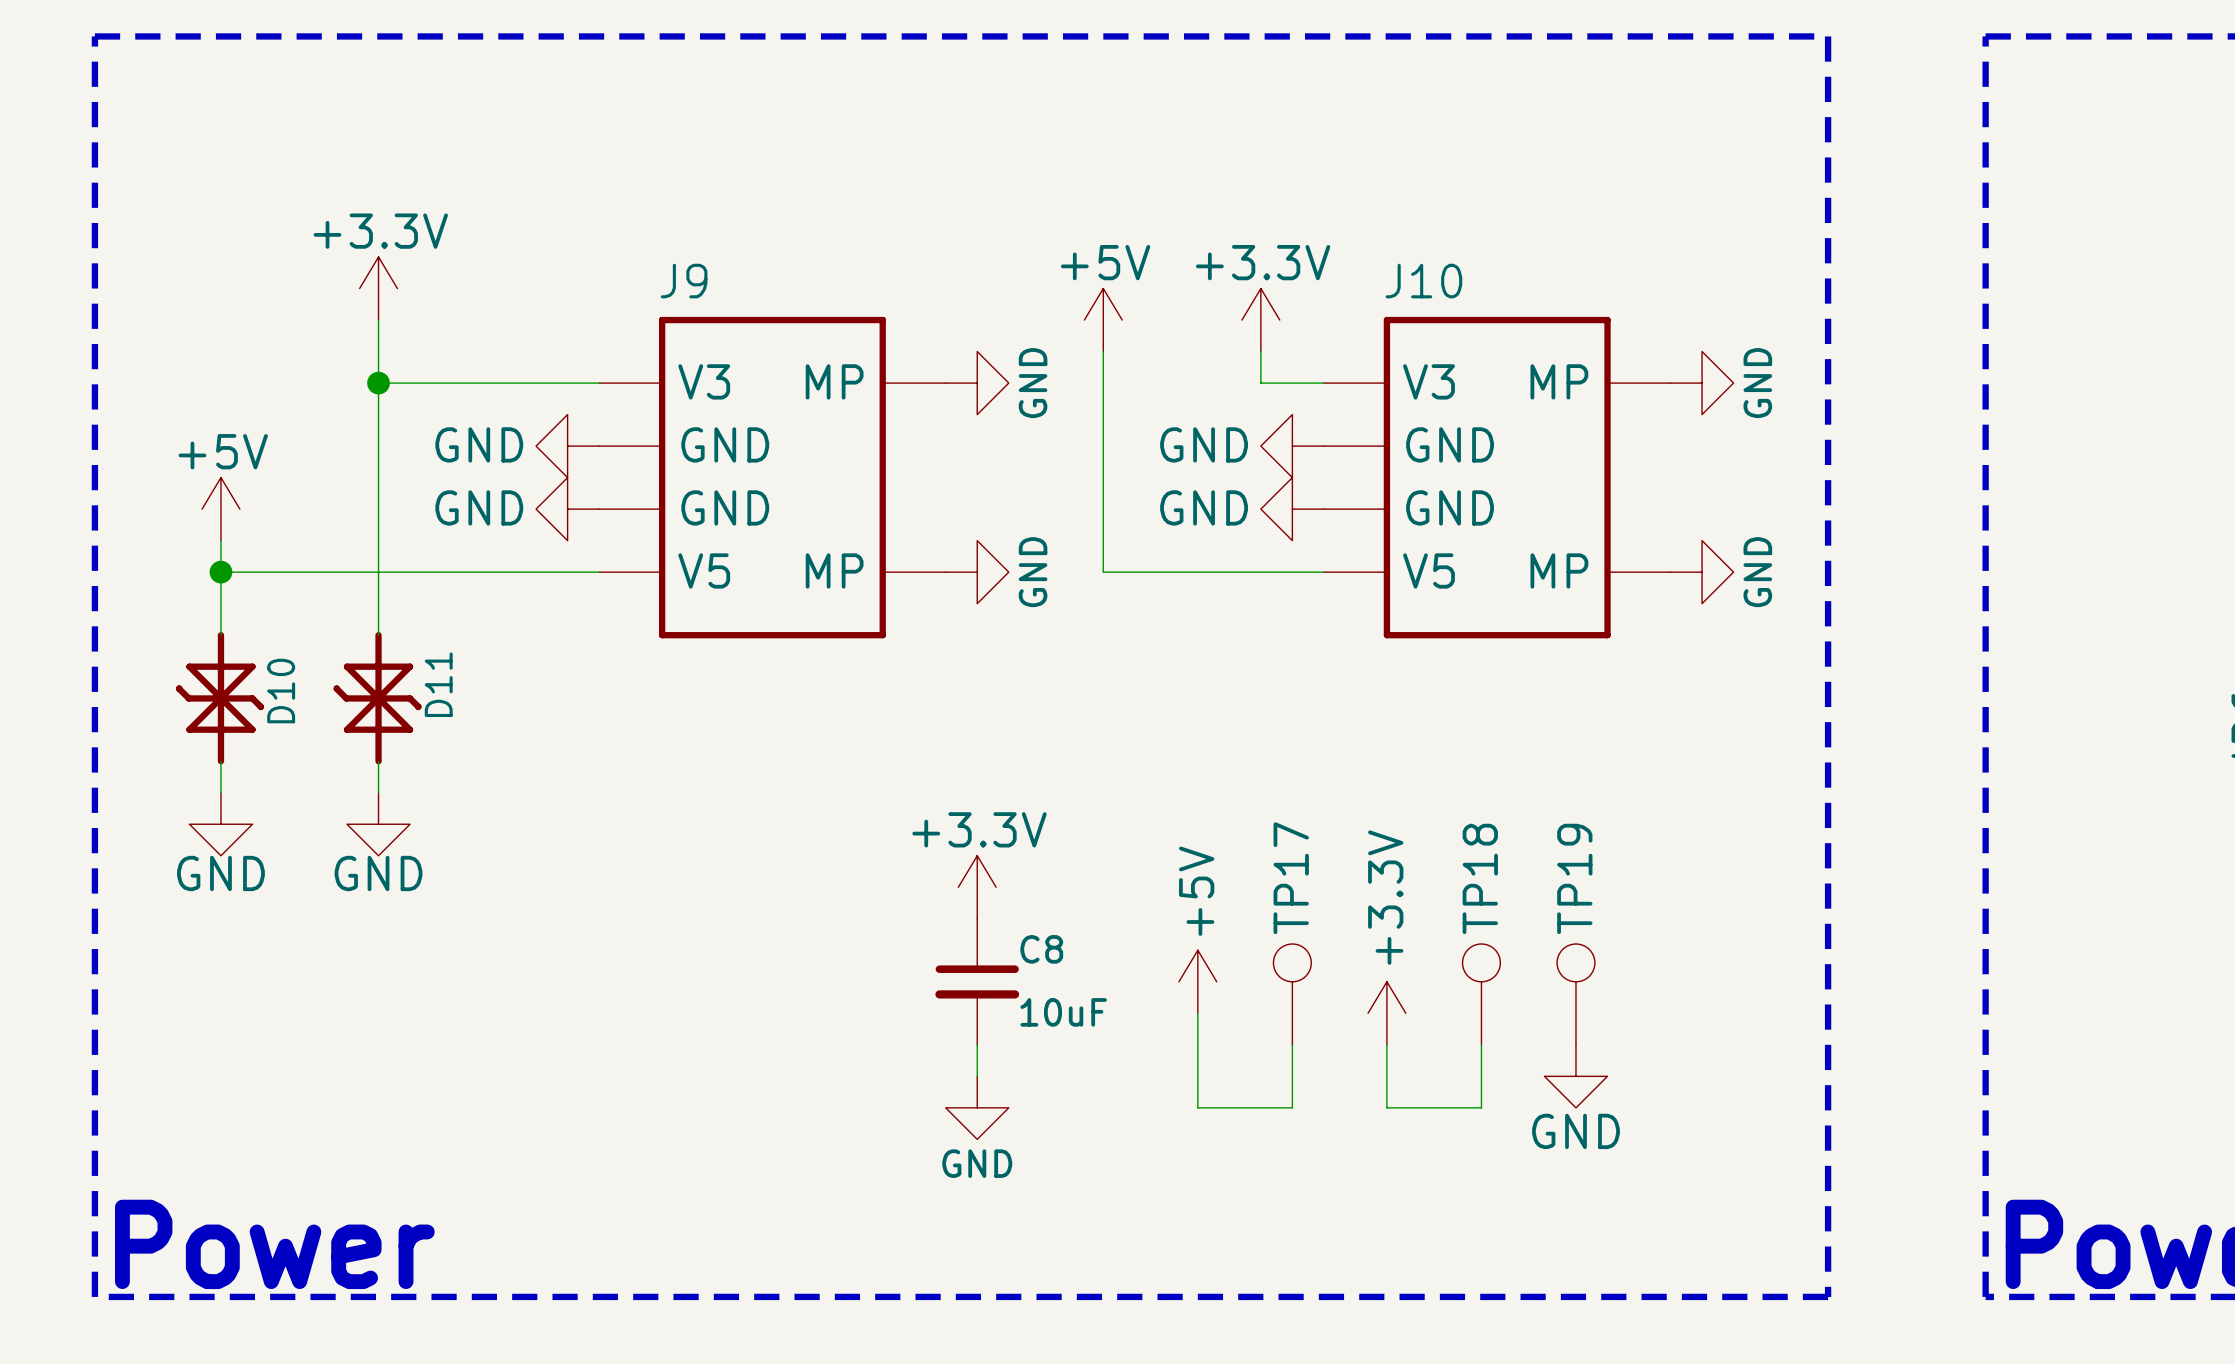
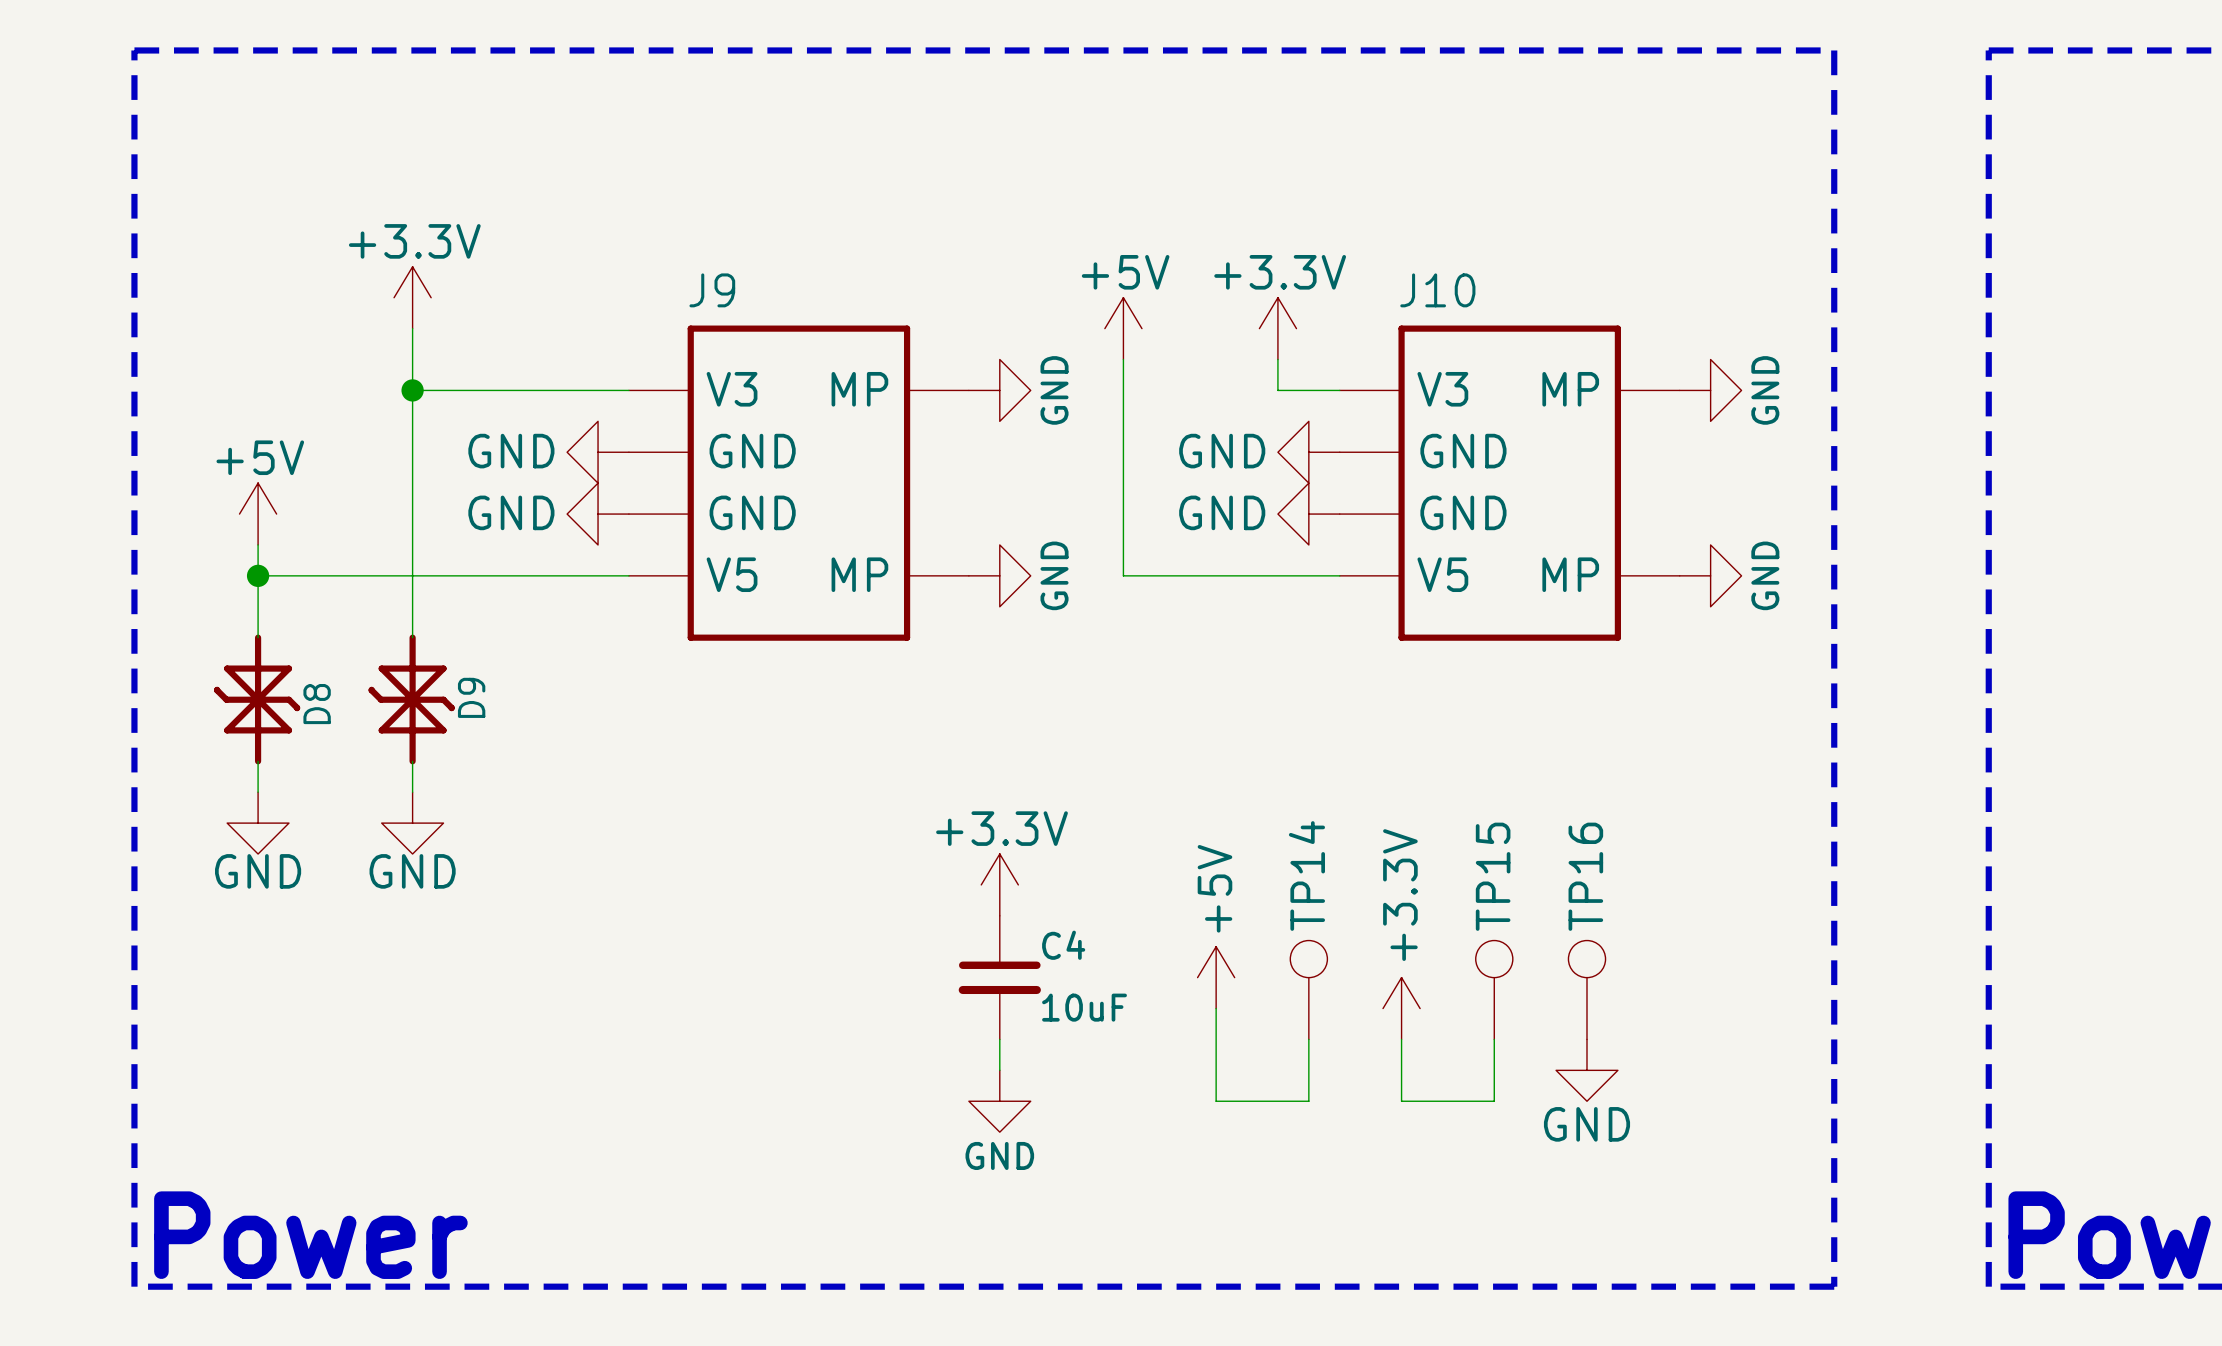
D11 name: D11 (438, 684) -> D9 (471, 697)
D10 name: D10 (281, 691) -> D8 (317, 704)
TP17 name: TP17 (1291, 878) -> TP14 (1306, 876)
TP18 name: TP18 (1480, 878) -> TP15 (1493, 876)
TP19 name: TP19 (1574, 878) -> TP16 (1585, 876)
C8 name: C8 (1041, 949) -> C4 (1063, 945)

